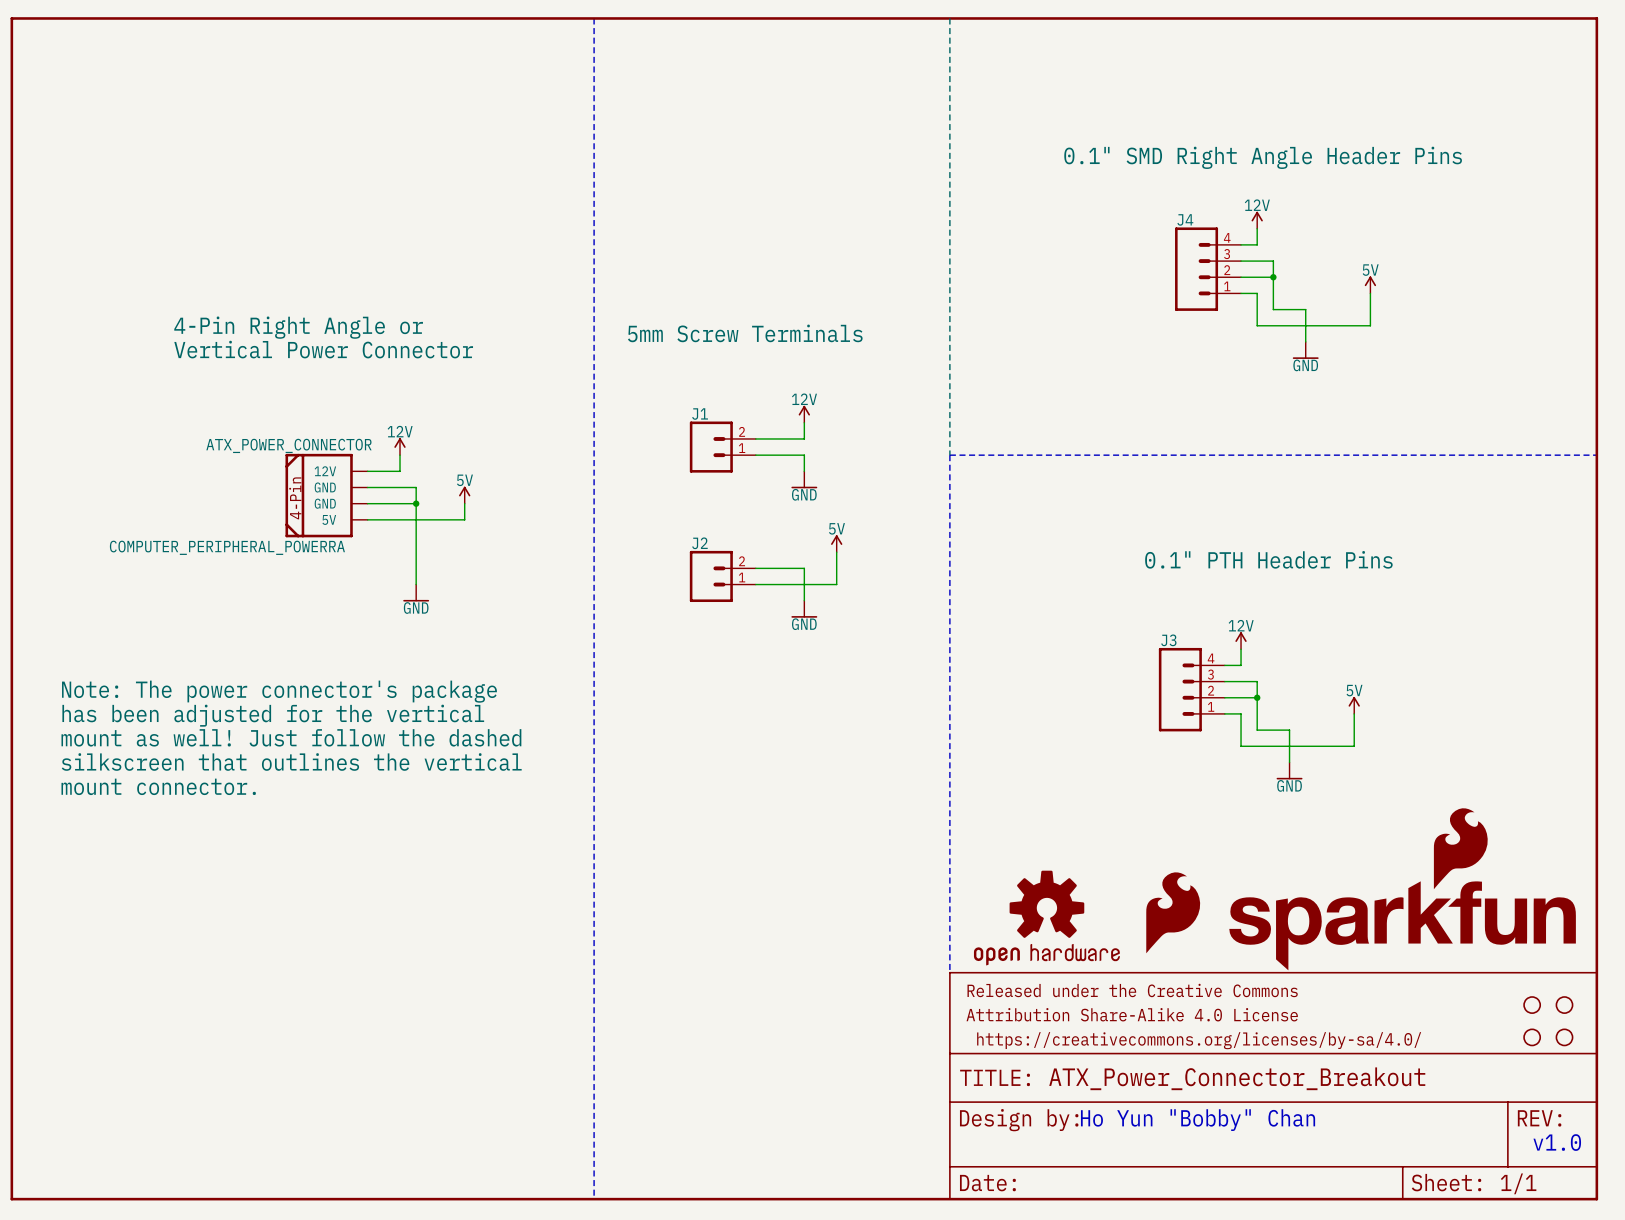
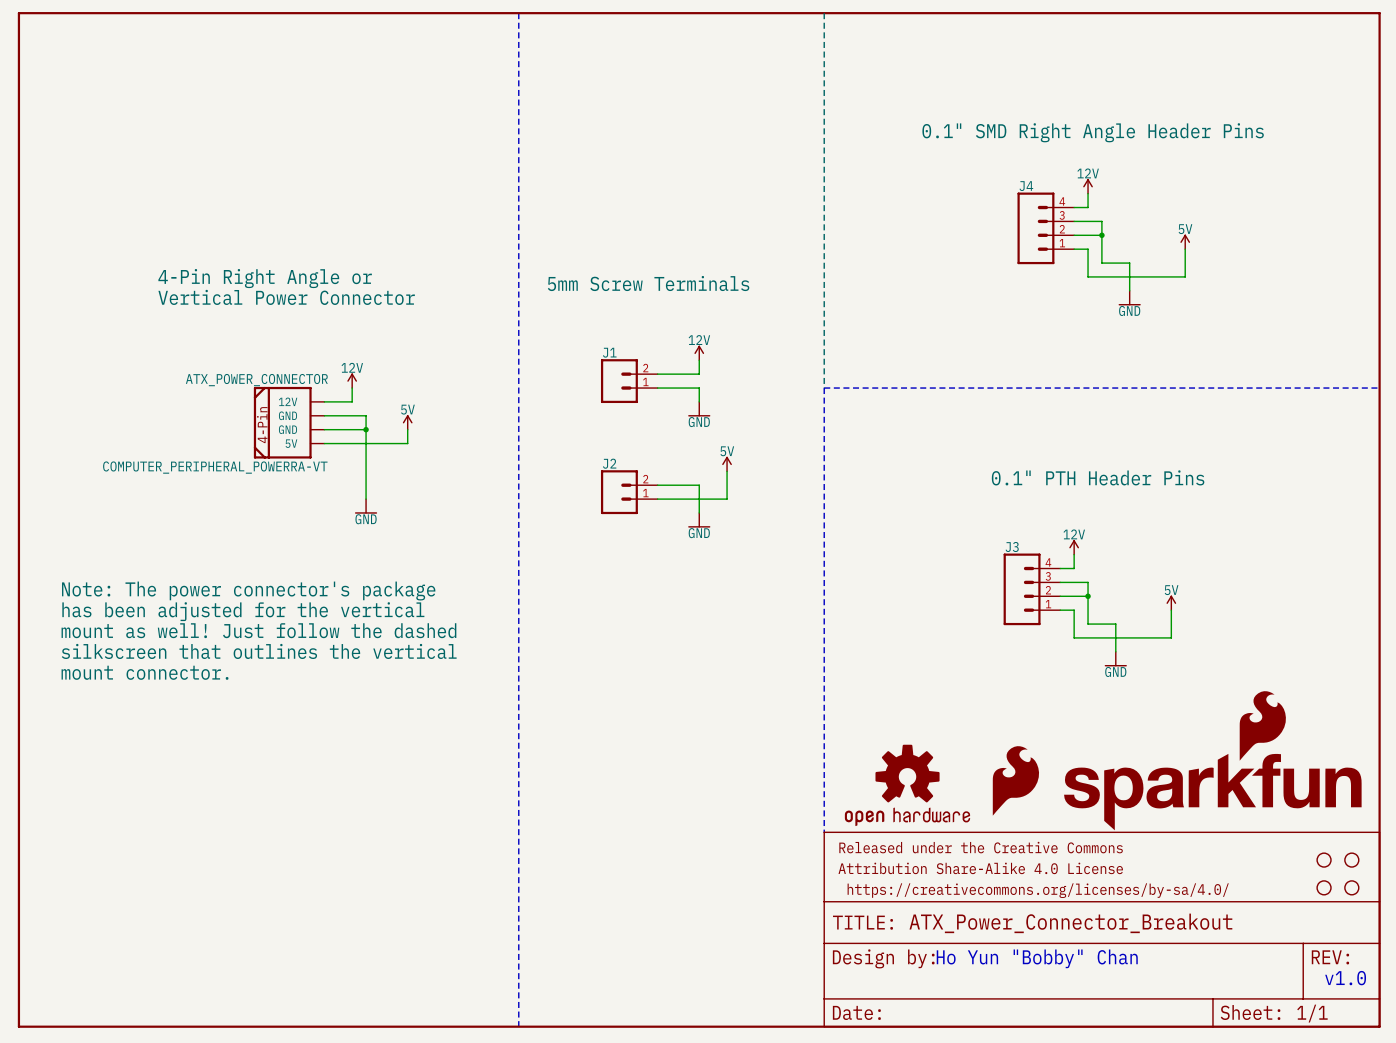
ATX_POWER_CONNECTOR value: COMPUTER_PERIPHERAL_POWERRA (227, 547) -> COMPUTER_PERIPHERAL_POWERRA-VT (215, 467)

